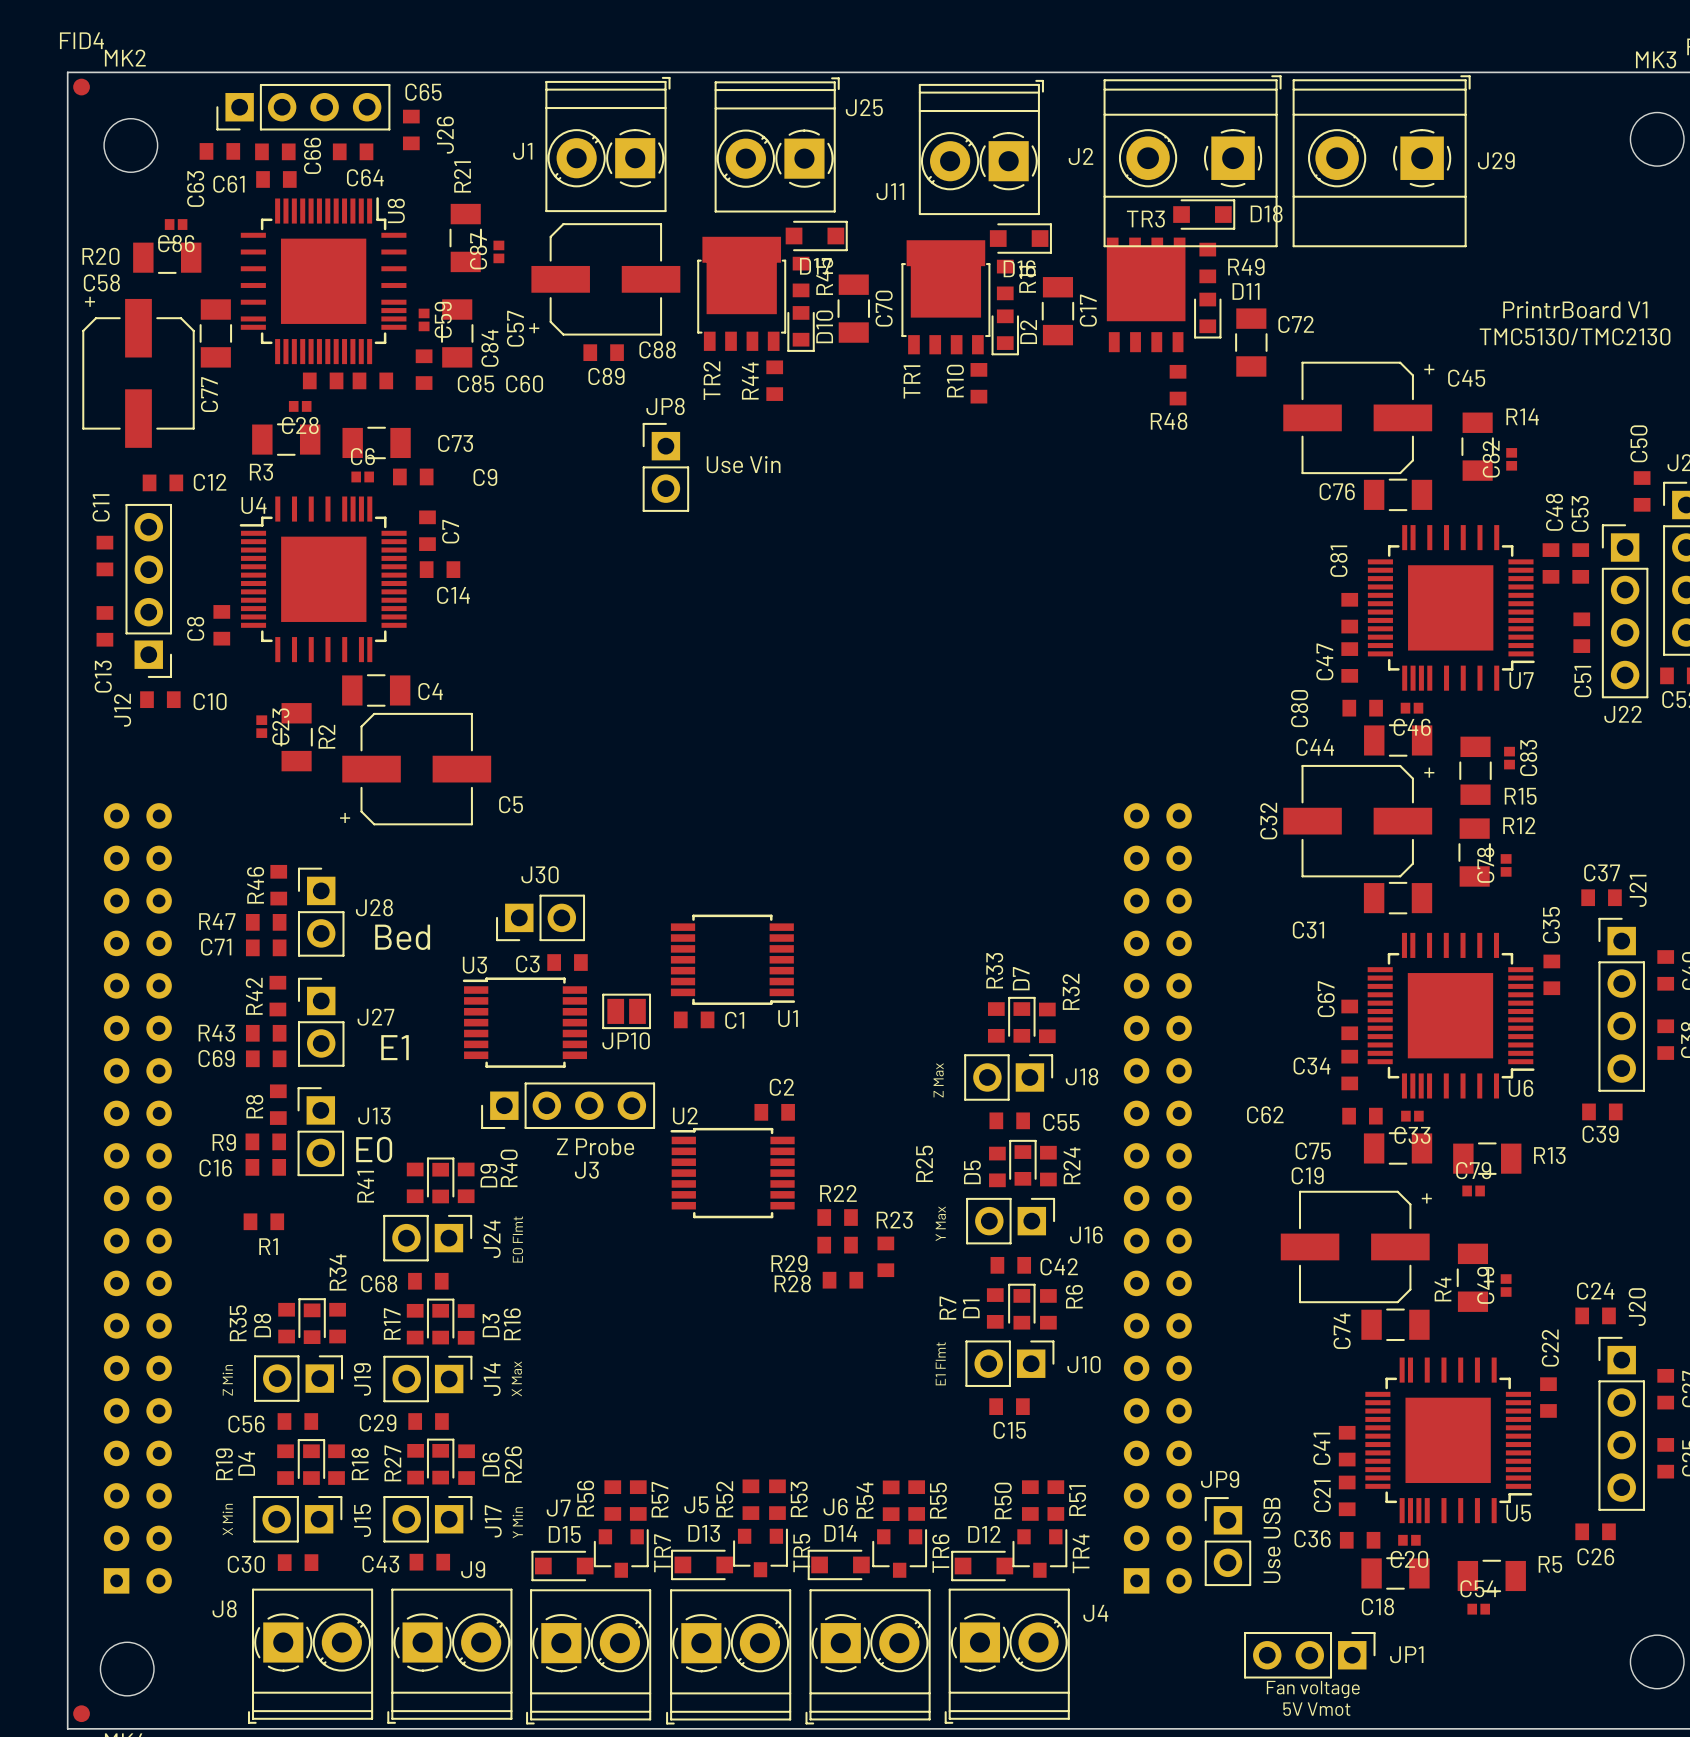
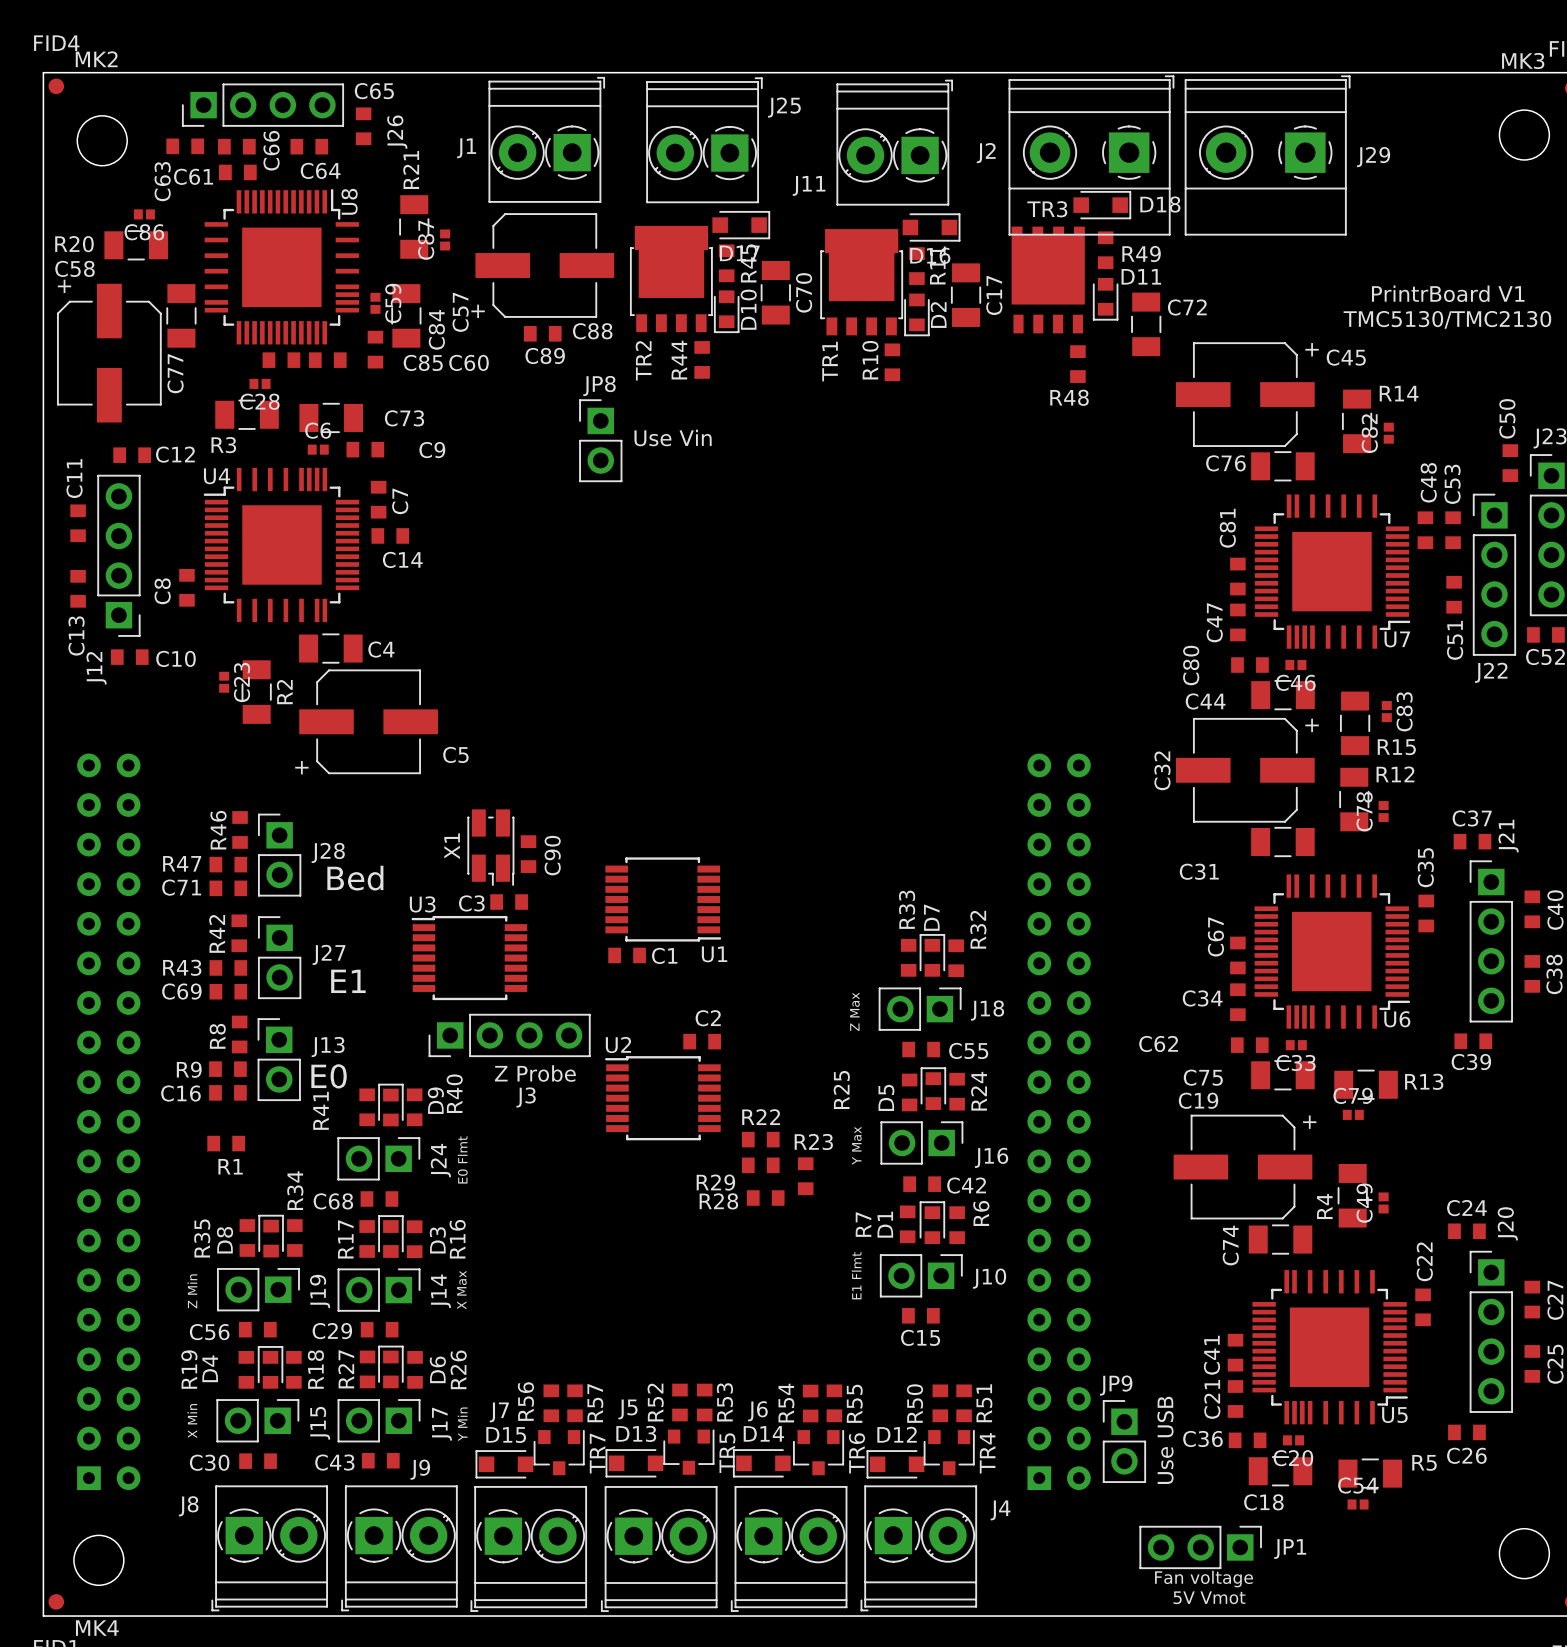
X1: none -> (490, 847)
C90: none -> (528, 854)
J30: (540, 917) -> none
JP10: (626, 1011) -> none

